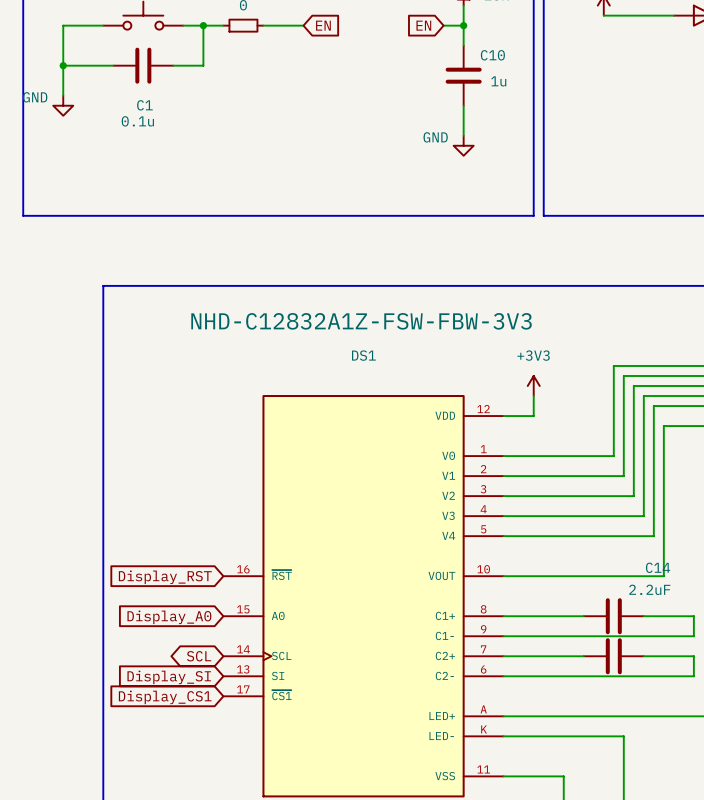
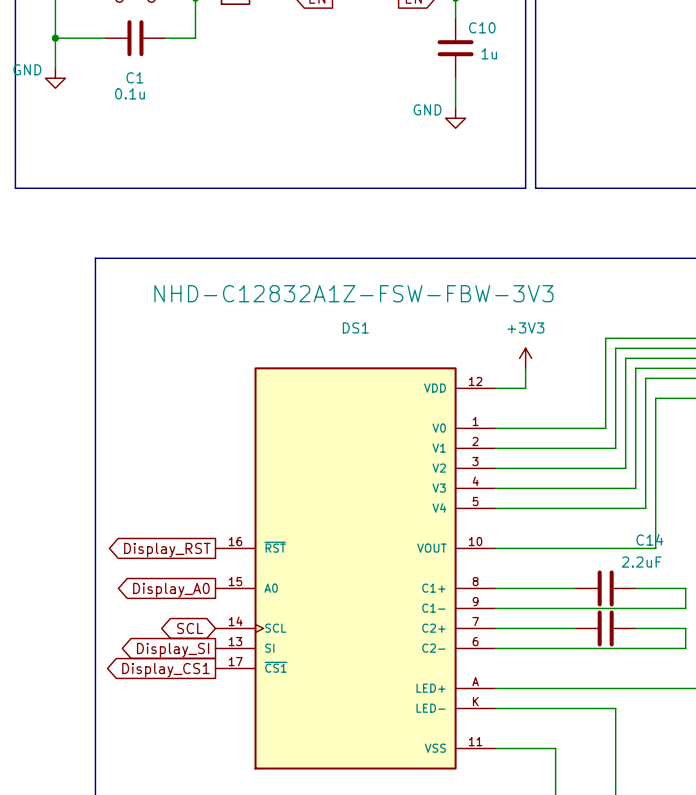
global label shape: input (165, 577) -> output (167, 550)
global label shape: input (169, 617) -> output (171, 590)
global label shape: input (169, 677) -> output (173, 650)
global label shape: input (165, 697) -> output (165, 670)

